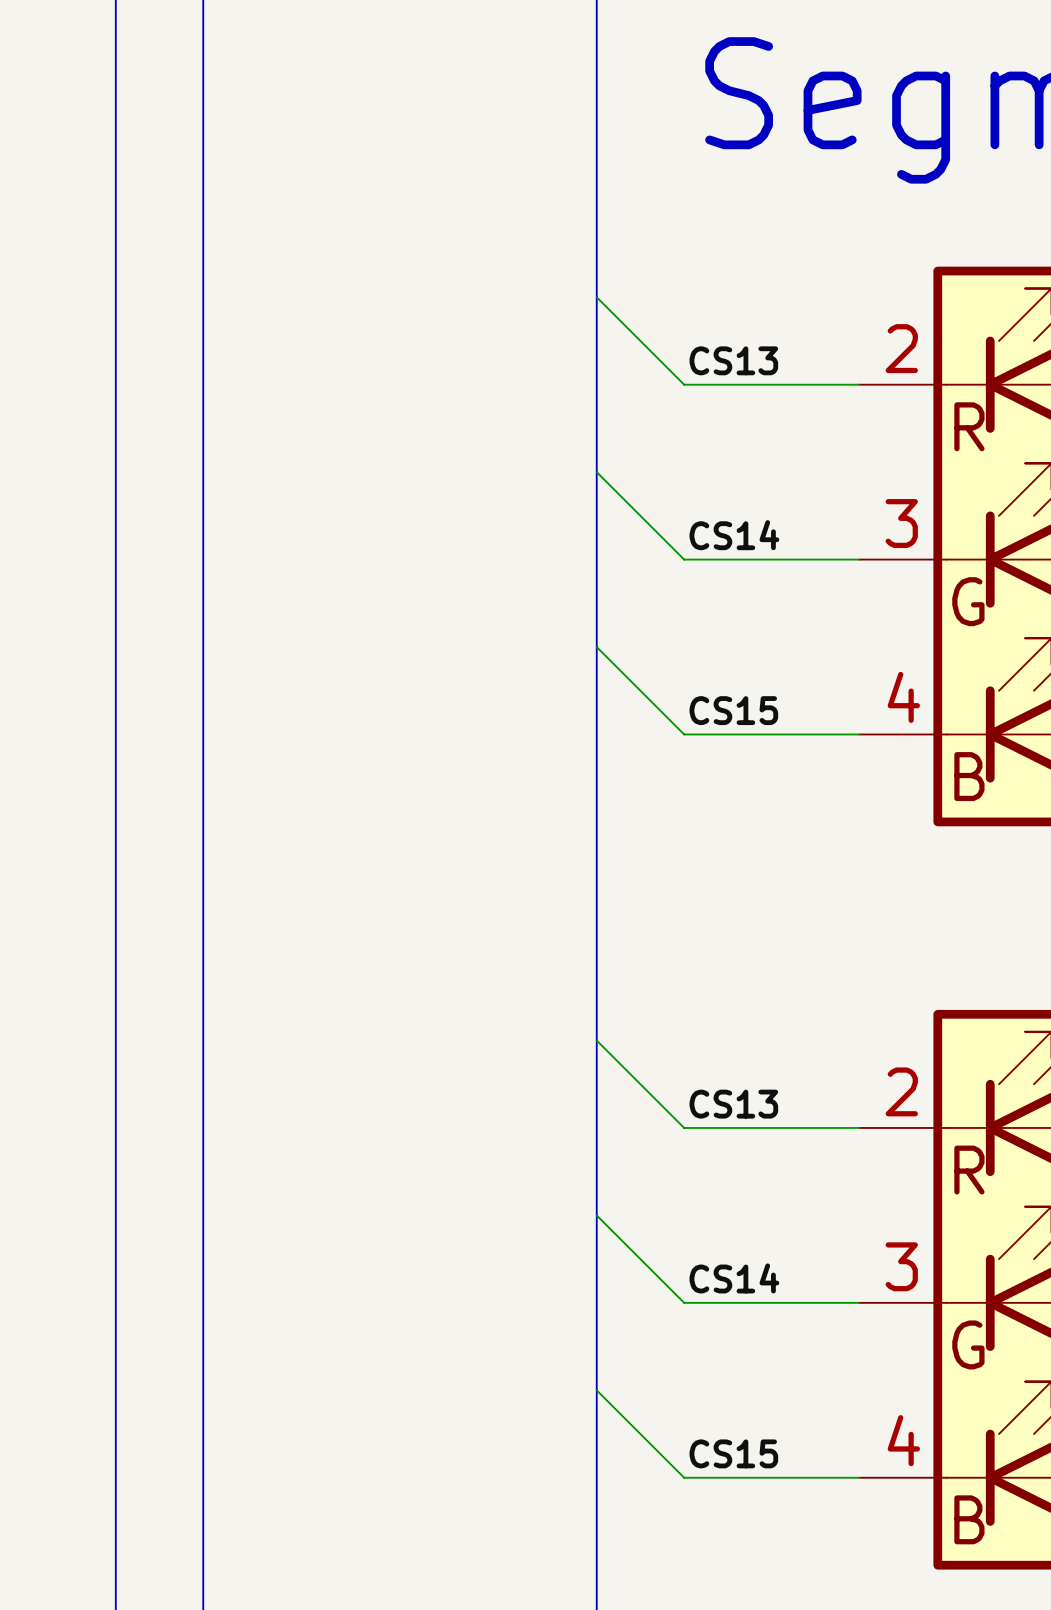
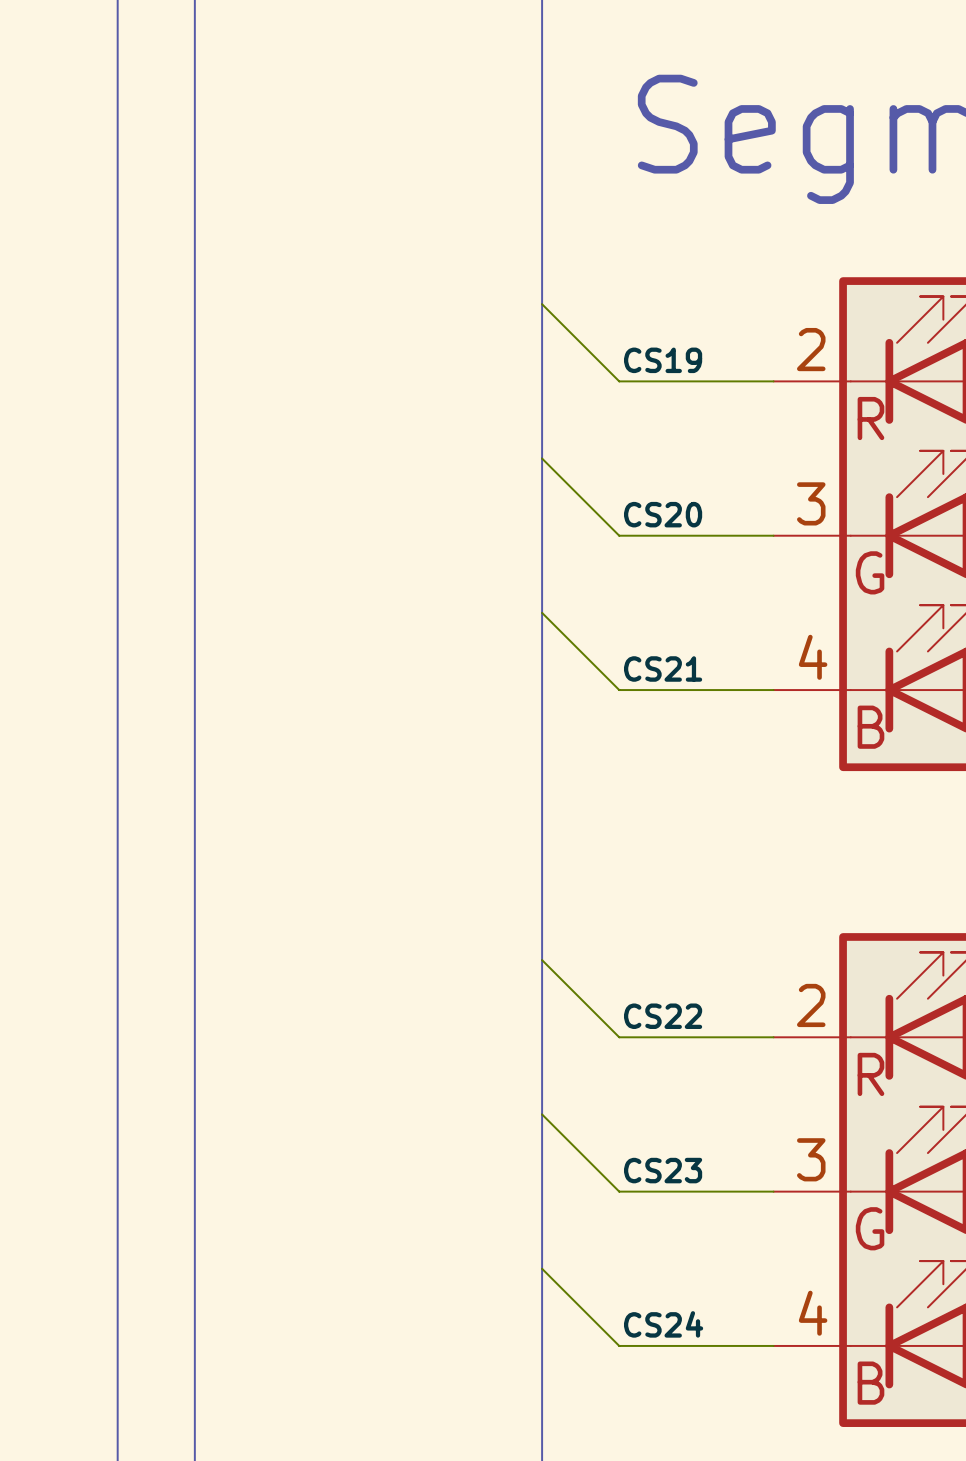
label: CS13 (733, 360) -> CS19 (663, 360)
label: CS14 (734, 535) -> CS20 (663, 514)
label: CS15 (733, 710) -> CS21 (663, 668)
label: CS13 (733, 1104) -> CS22 (663, 1016)
label: CS14 (734, 1278) -> CS23 (663, 1170)
label: CS15 (733, 1453) -> CS24 (663, 1324)

